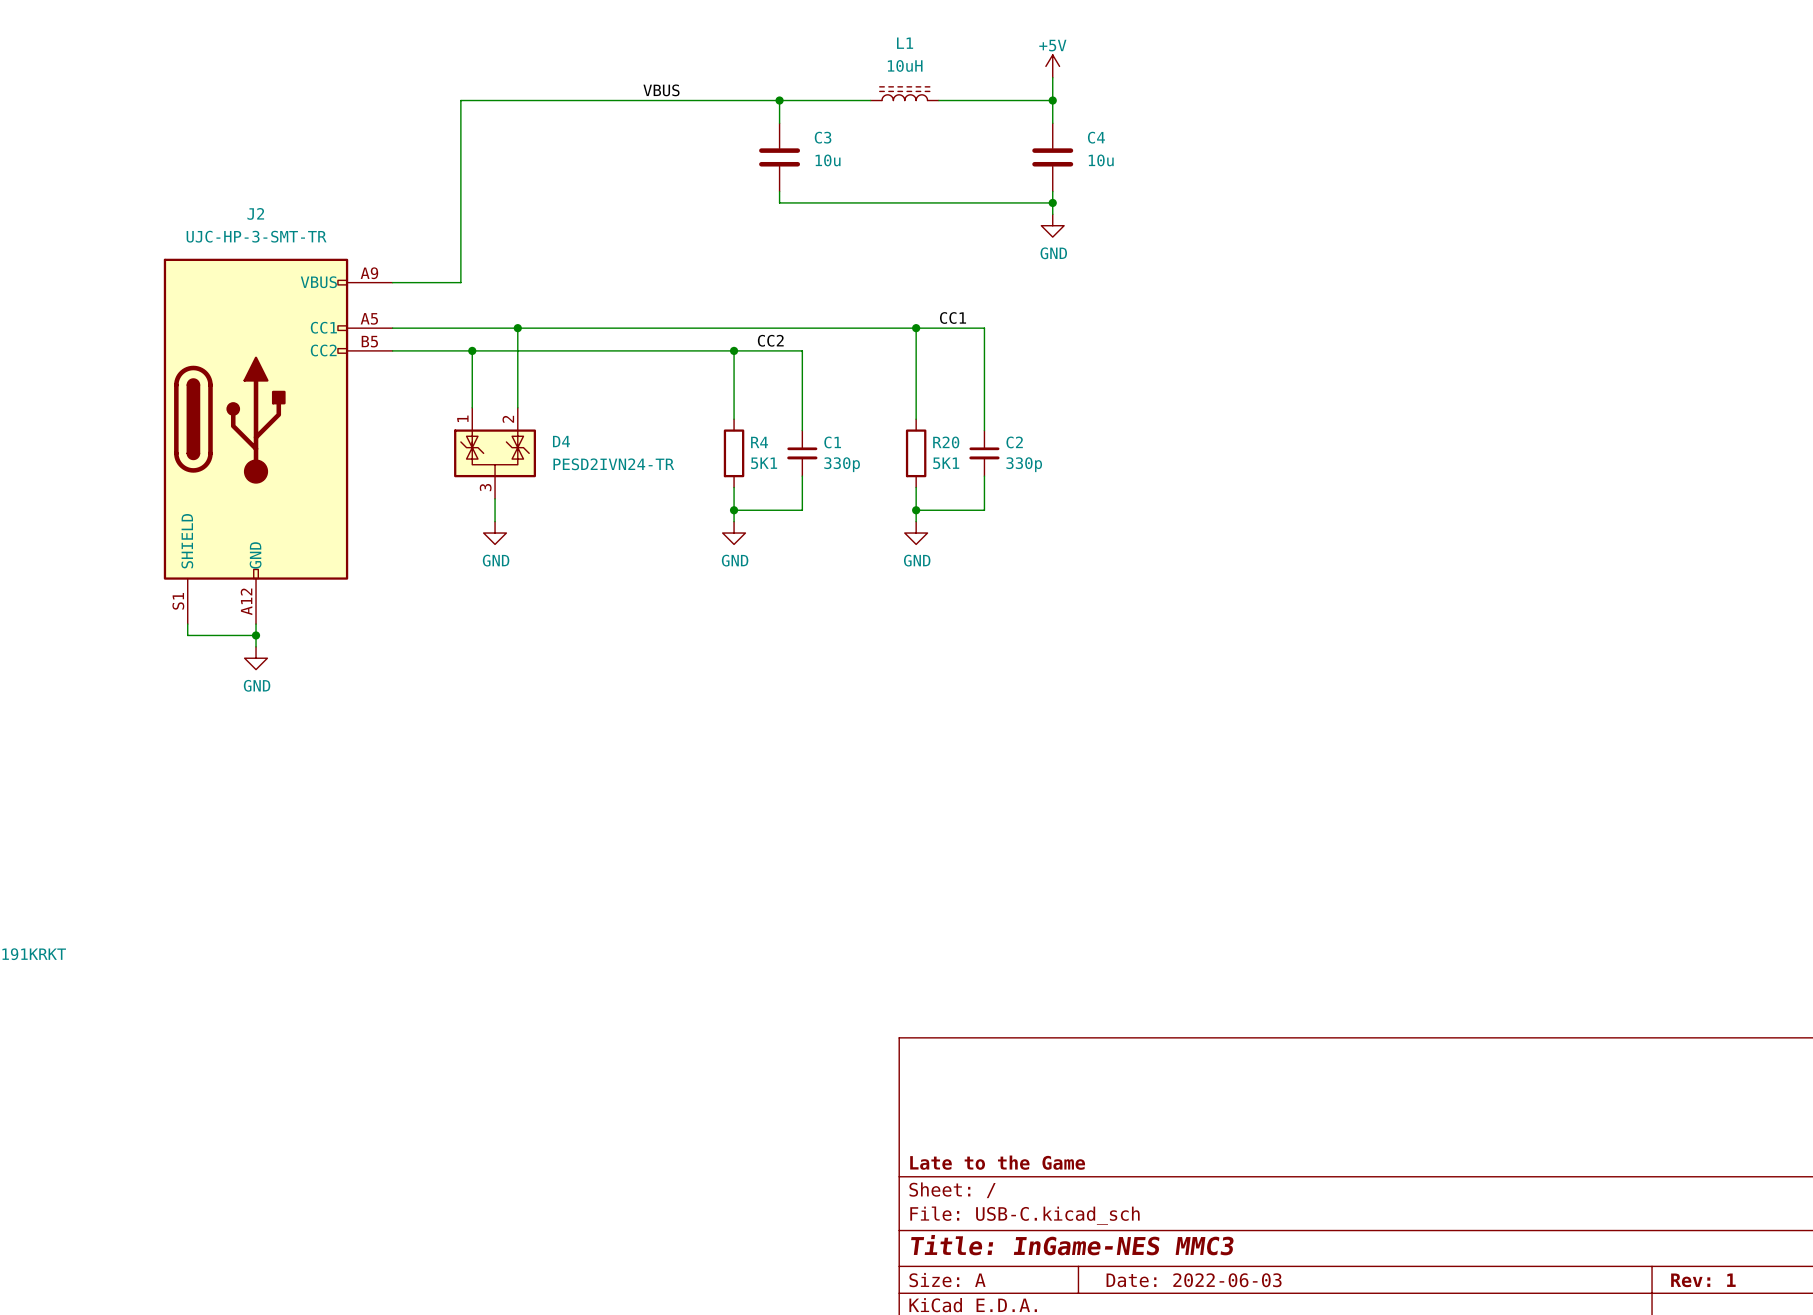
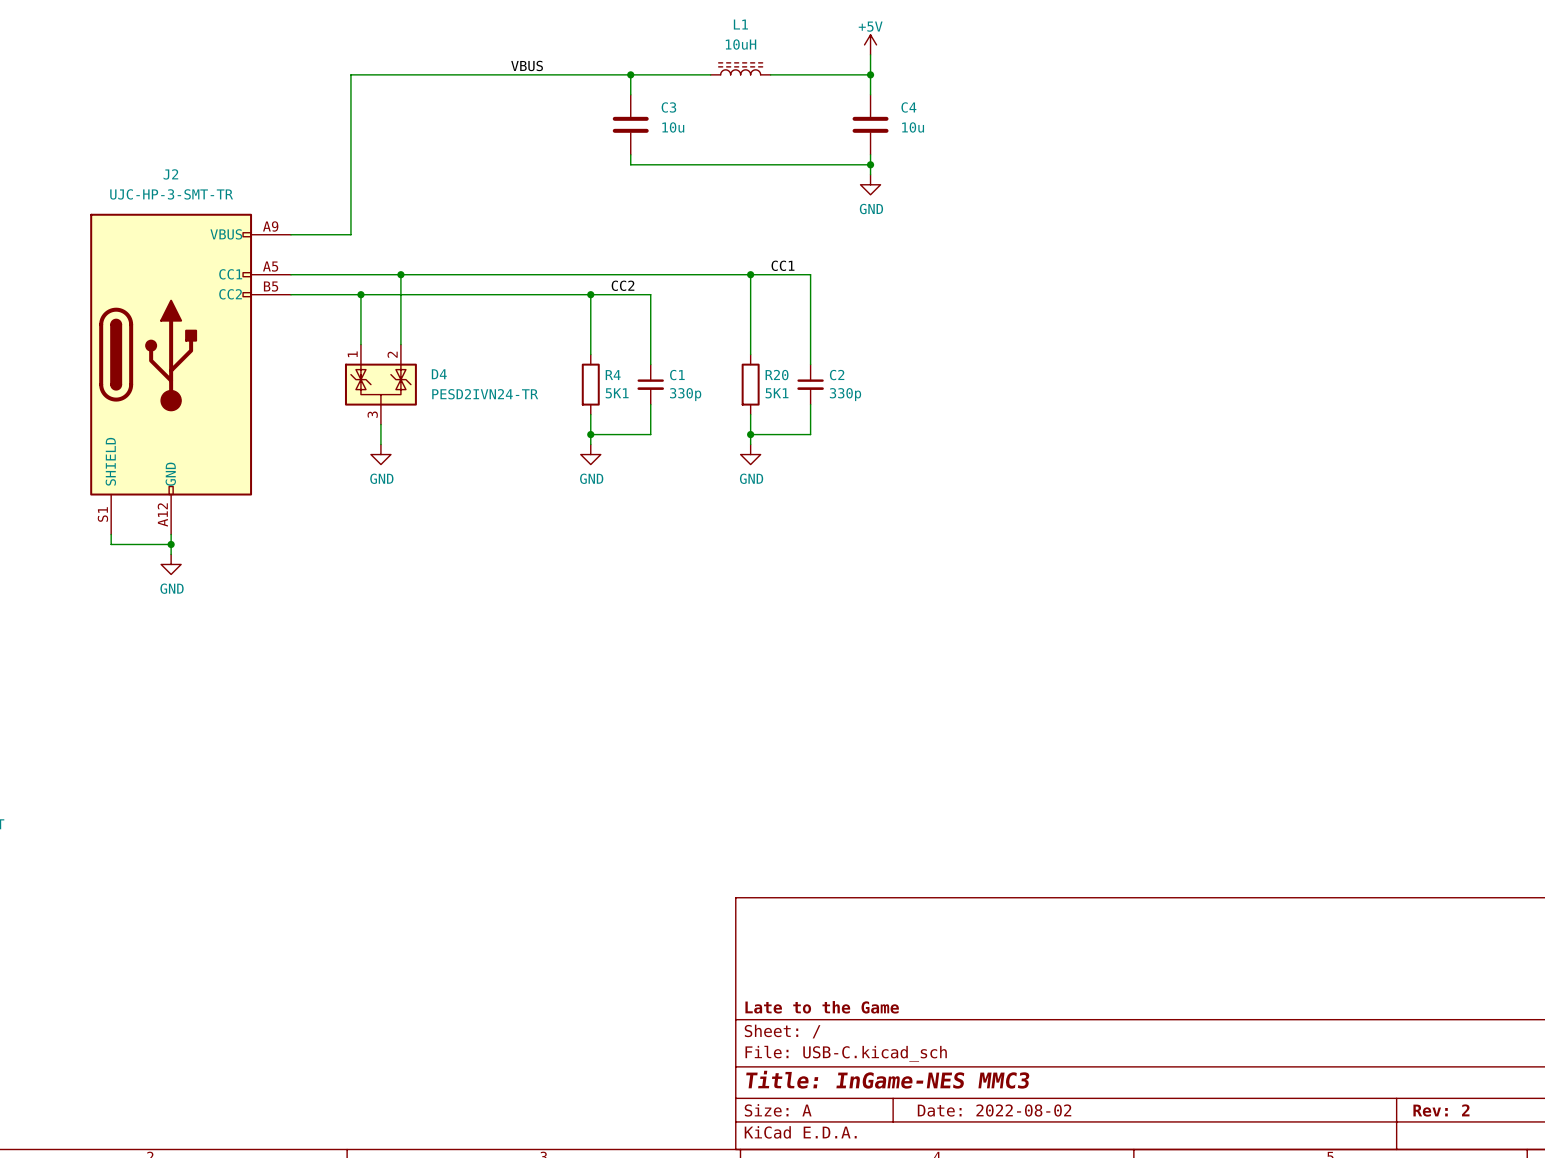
title block: Date: 2022-06-03 (1194, 1280) -> Date: 2022-08-02 (994, 1110)
title block: Rev: 1 (1703, 1280) -> Rev: 2 (1441, 1110)

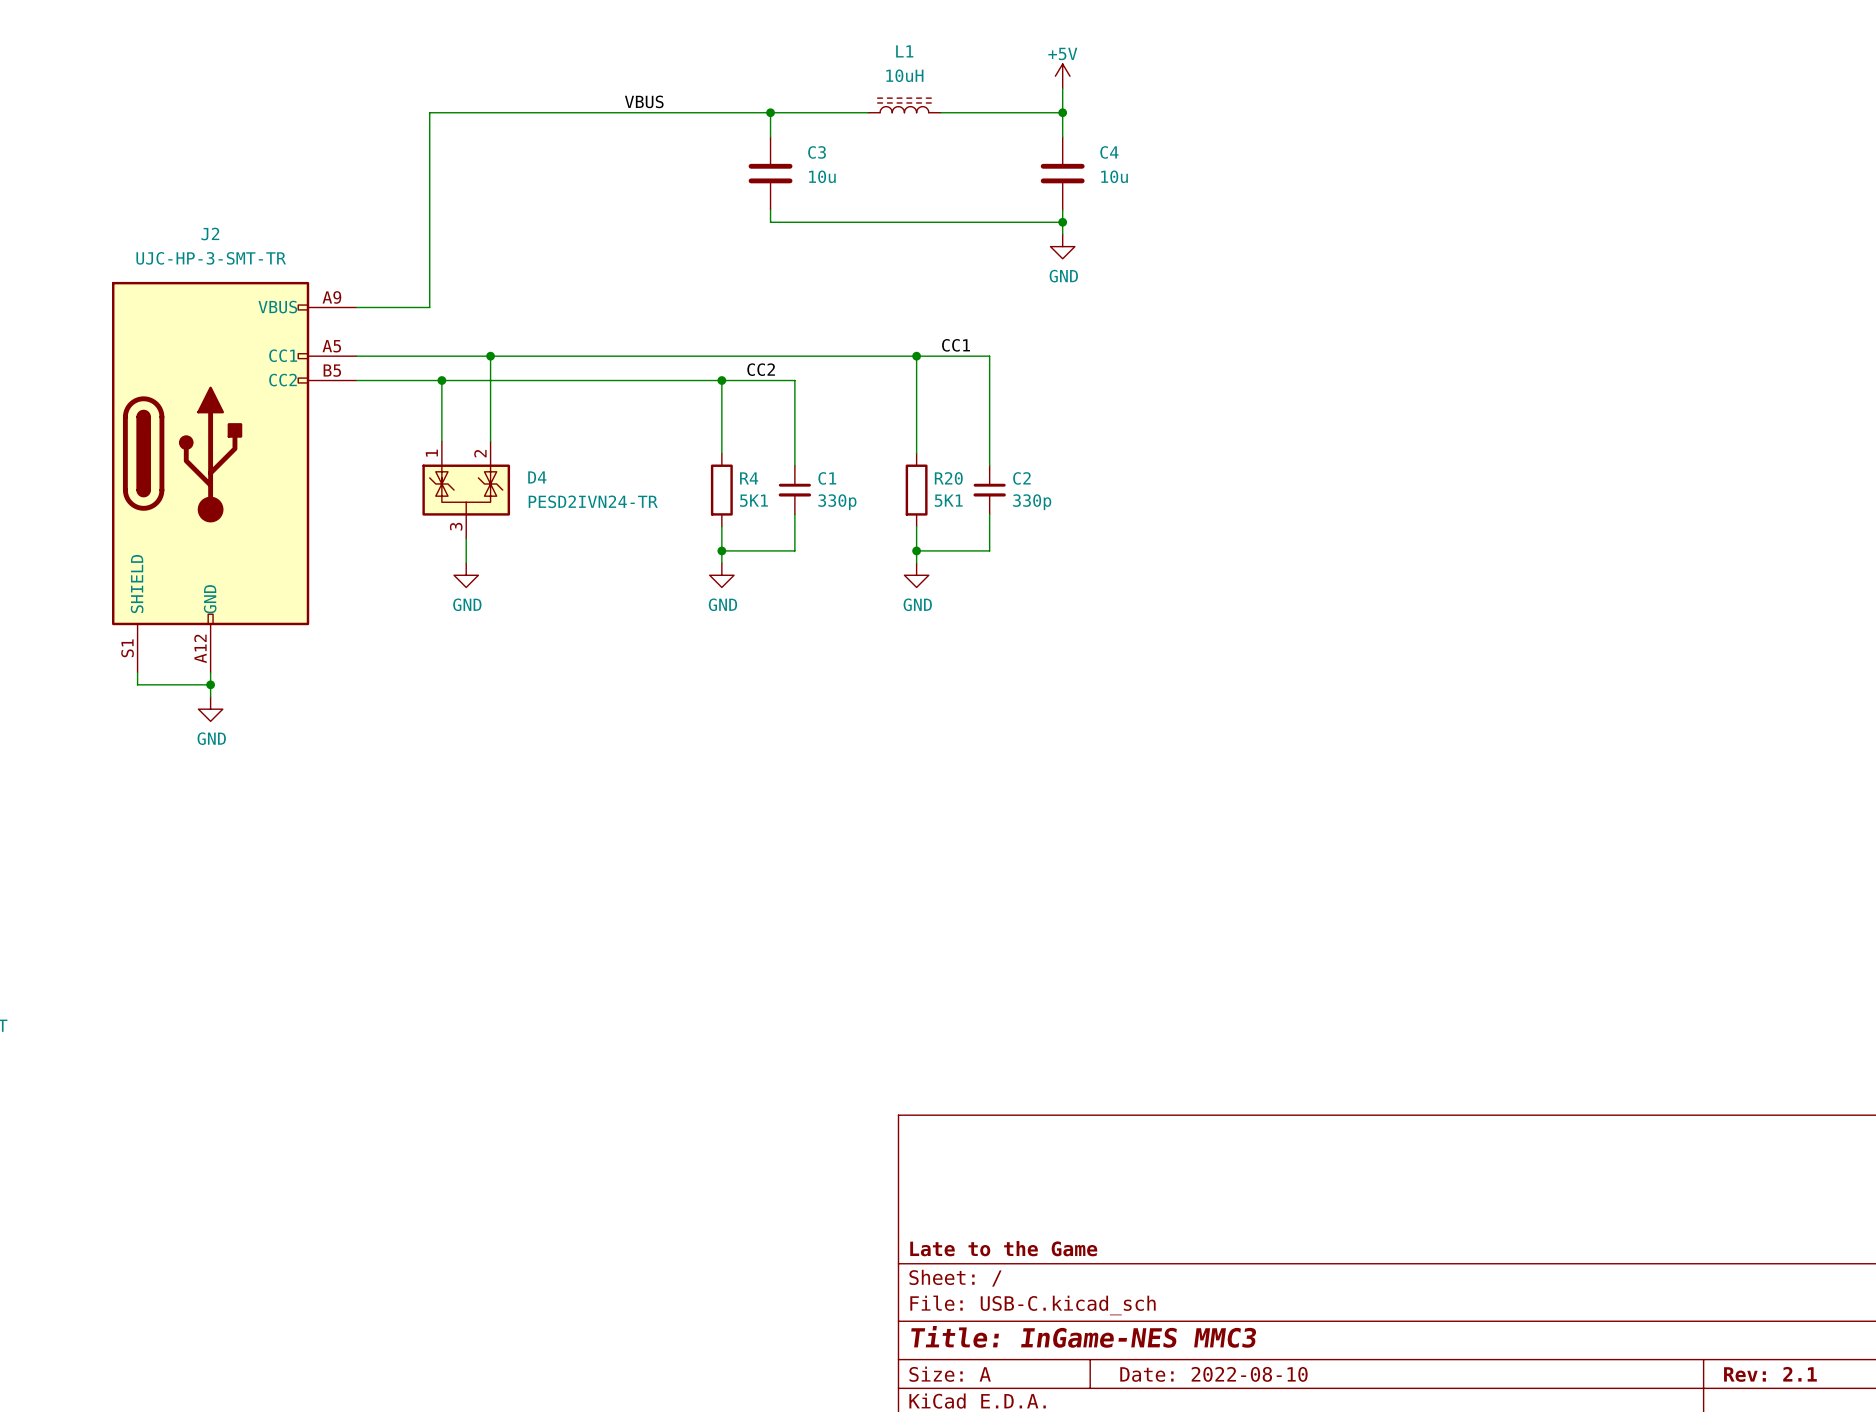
title block: Date: 2022-08-02 (994, 1110) -> Date: 2022-08-10 (1213, 1374)
title block: Rev: 2 (1441, 1110) -> Rev: 2.1 (1770, 1374)

